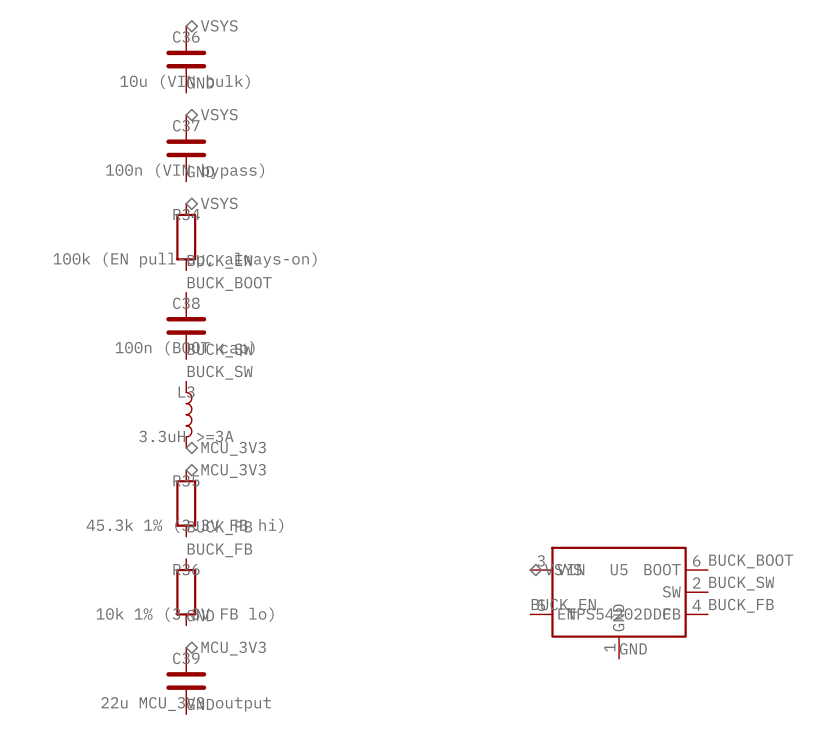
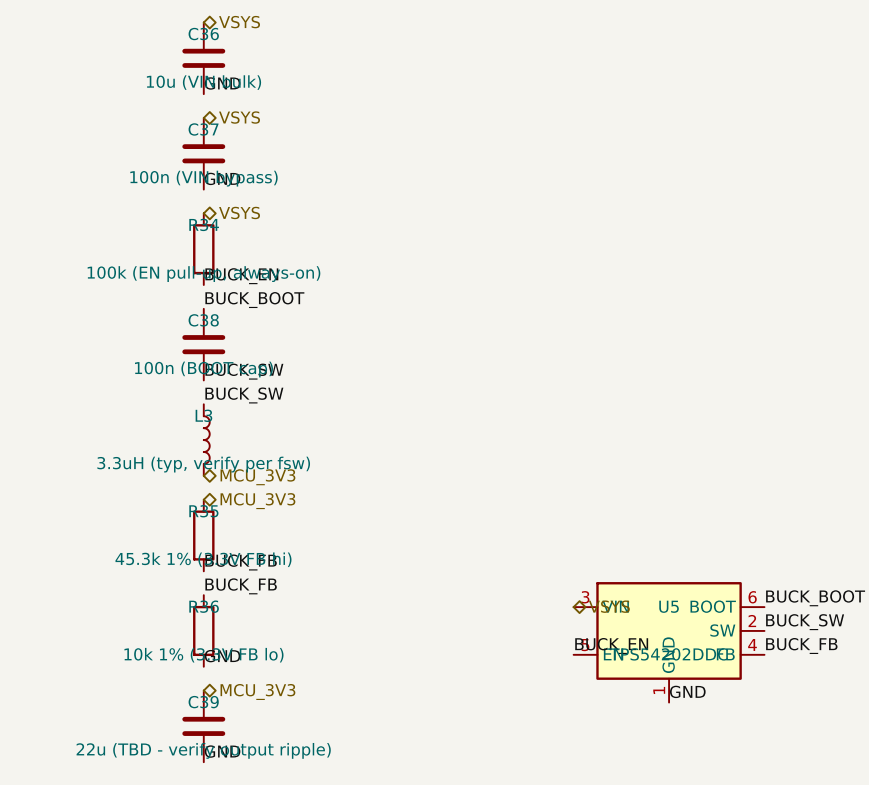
L3 value: 3.3uH >=3A (186, 436) -> 3.3uH (typ, verify per fsw) (203, 464)
C39 value: 22u MCU_3V3 output (186, 704) -> 22u (TBD - verify output ripple) (203, 750)

